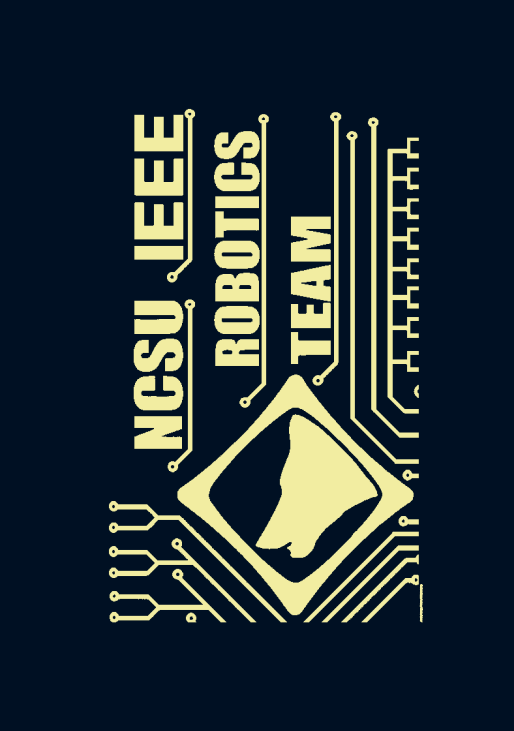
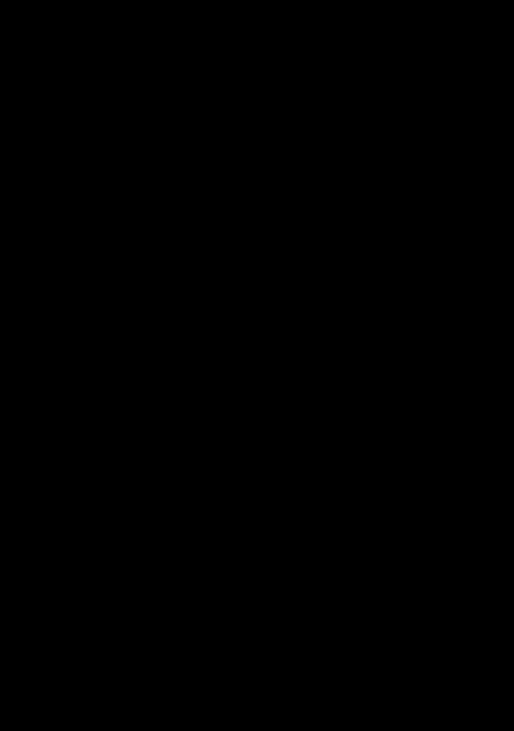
drawing: [108, 108, 419, 623] -> none

